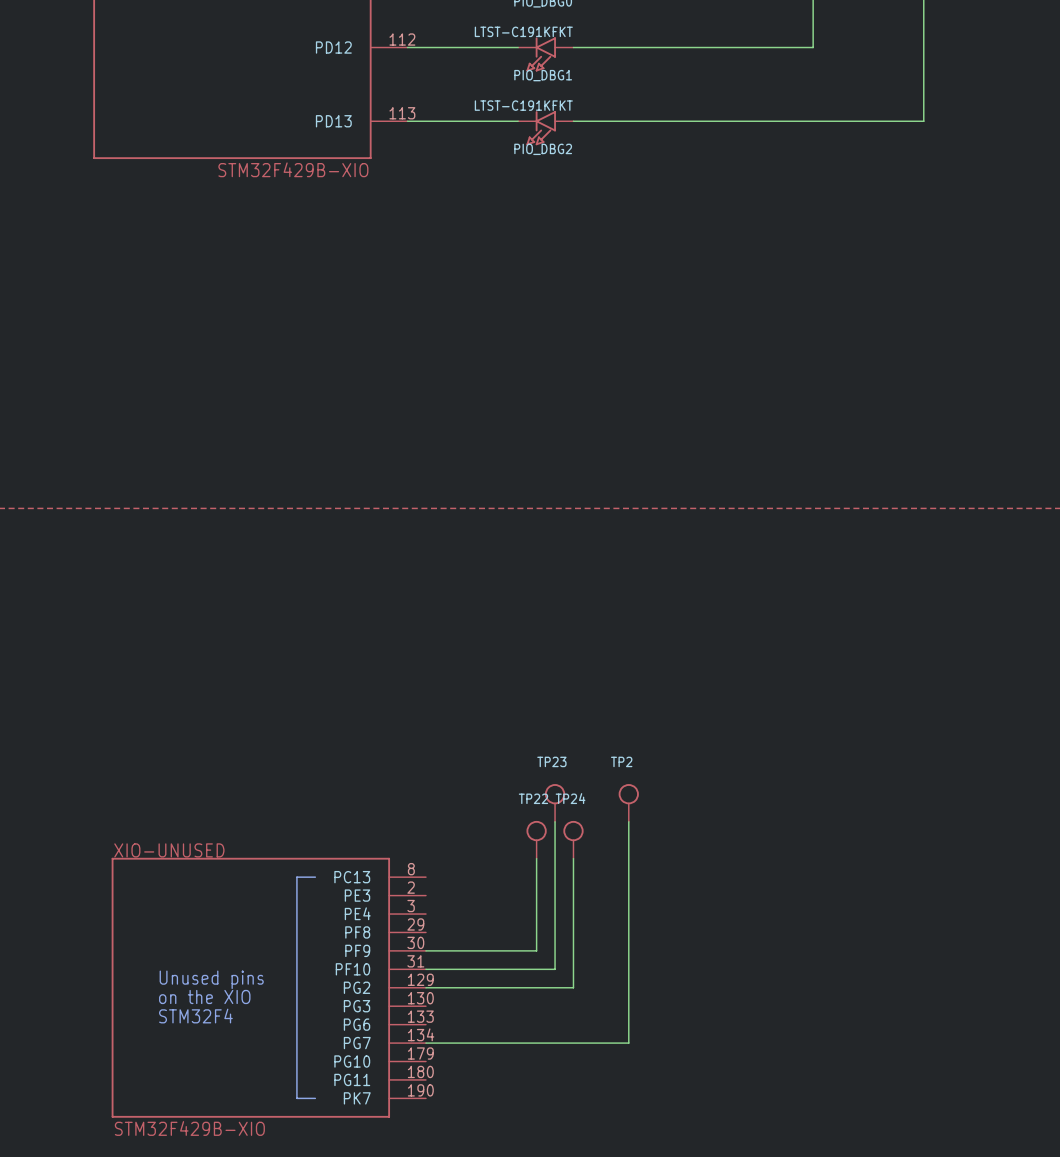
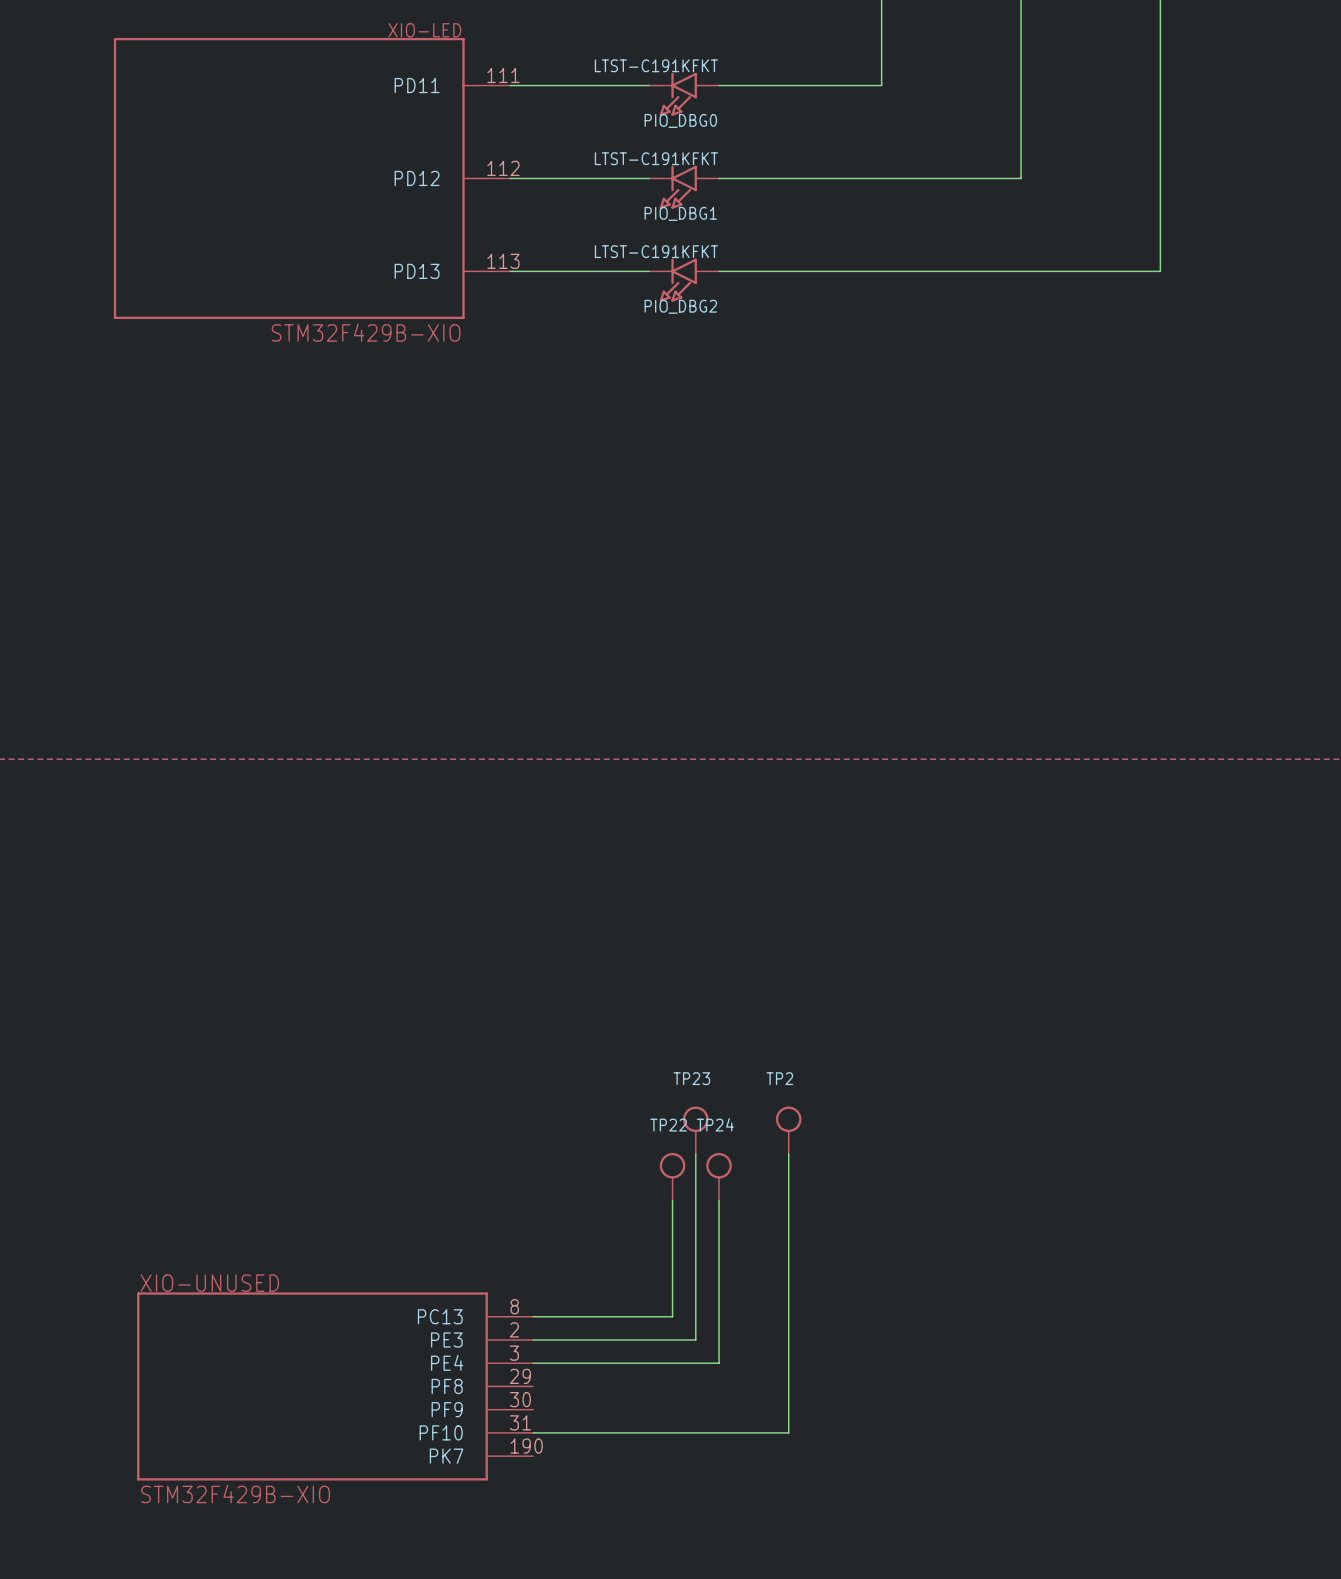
line: (315, 877) (296, 877) (296, 1098) (315, 1098) -> none
text: Unused pins (211, 979) -> none
XIO-UNUSED: STM32F429B-XIO (268, 987) -> none
text: on the XIO (204, 996) -> none
XIO-UNUSED: none -> STM32F429B-XIO (335, 1386)
text: STM32F4 (195, 1016) -> none

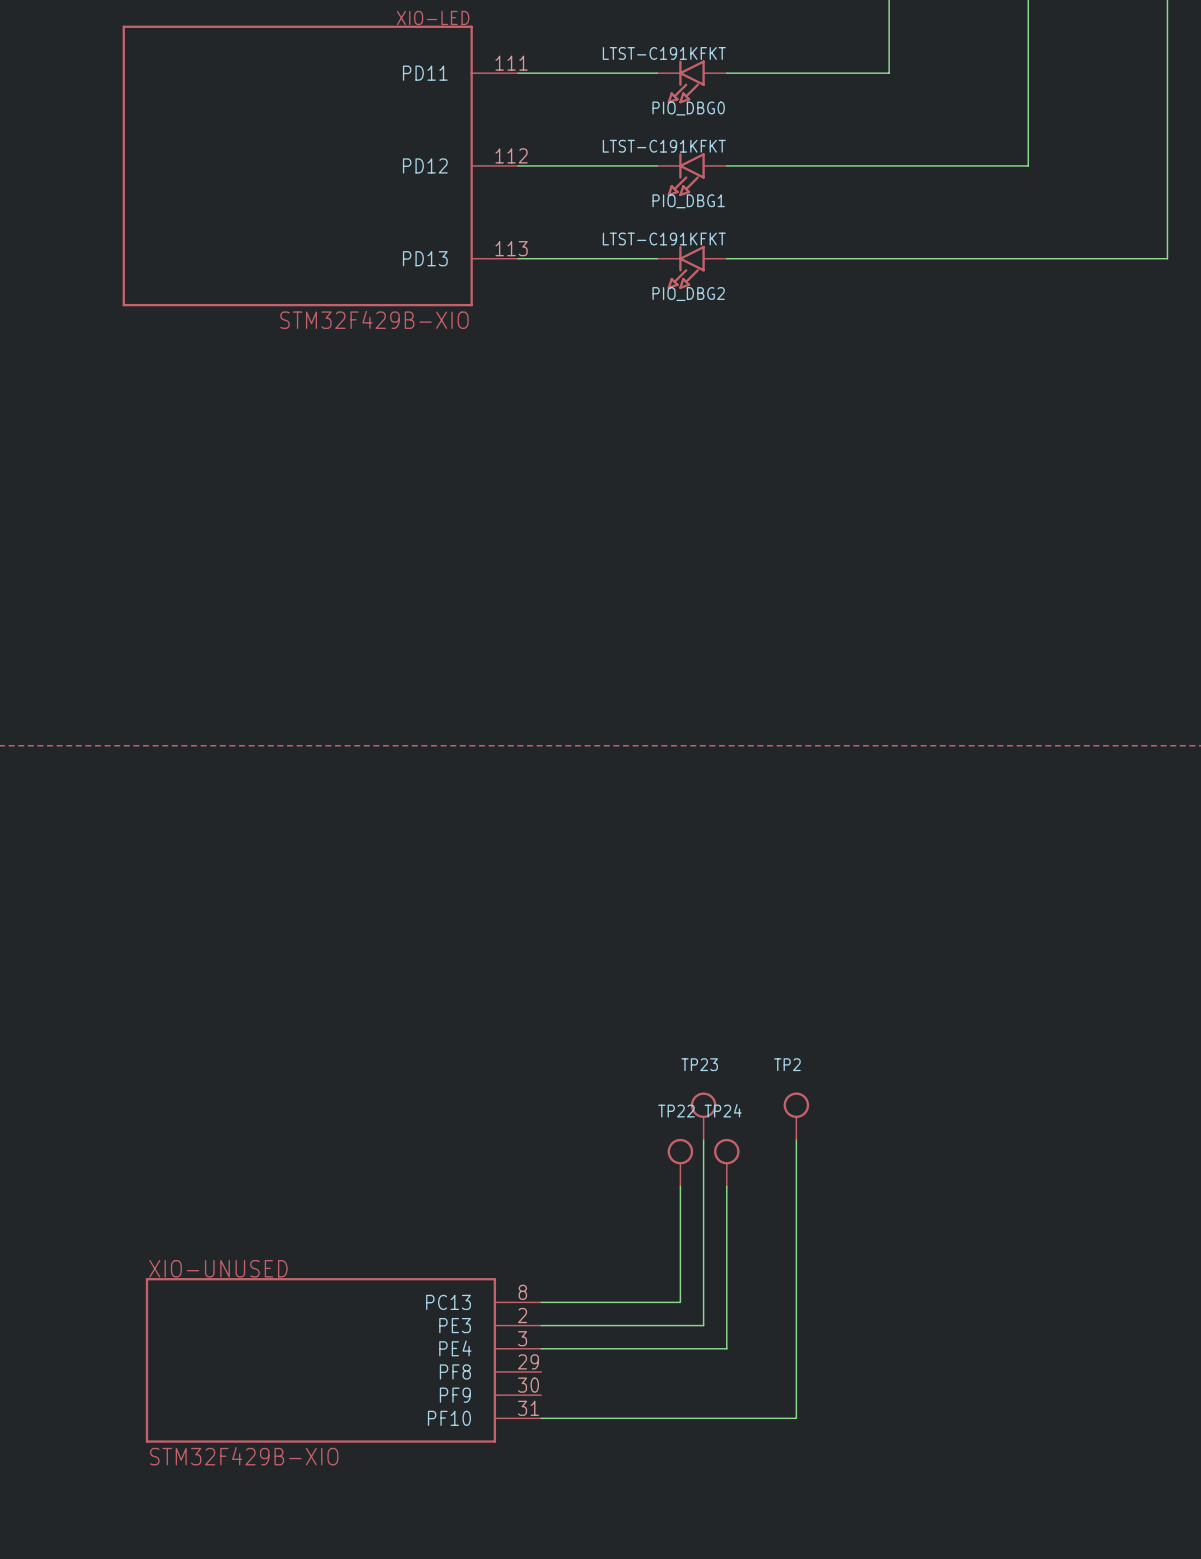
XIO-UNUSED: none -> STM32F429B-XIO (343, 1360)
XIO-UNUSED: STM32F429B-XIO (335, 1386) -> none

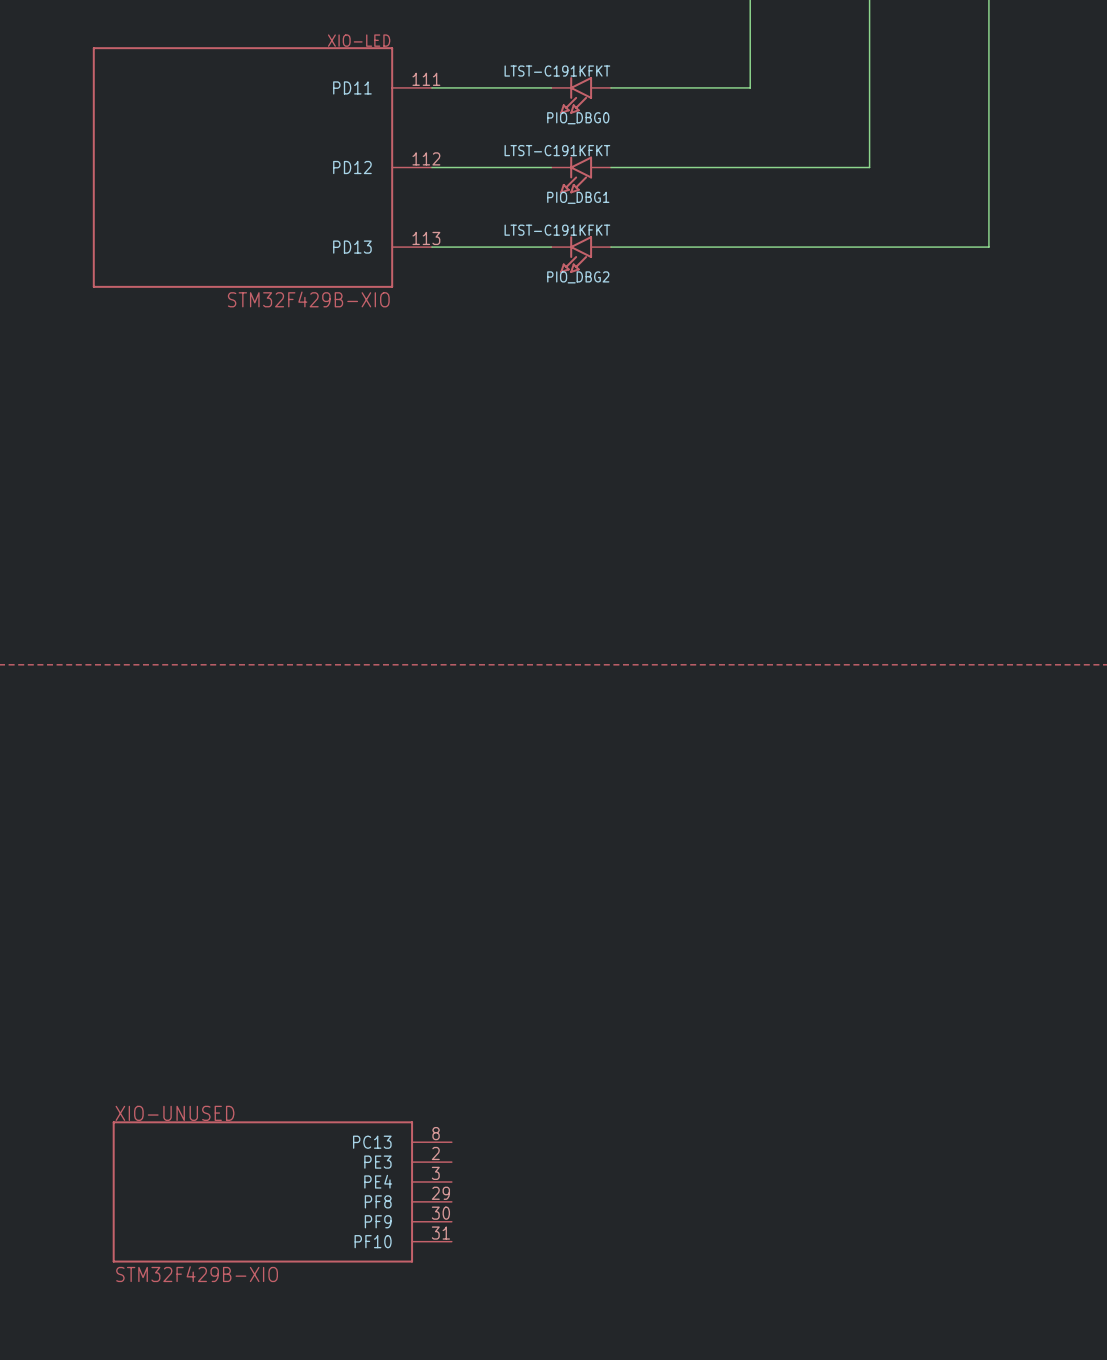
TP23: (703, 1116) -> none
TP2: (796, 1116) -> none
wire: (703, 1140) (703, 1325) (541, 1325) -> none
wire: (796, 1140) (796, 1418) (541, 1418) -> none
TP22: (680, 1162) -> none
TP24: (726, 1162) -> none
wire: (680, 1186) (680, 1302) (541, 1302) -> none
wire: (726, 1186) (726, 1348) (541, 1348) -> none

